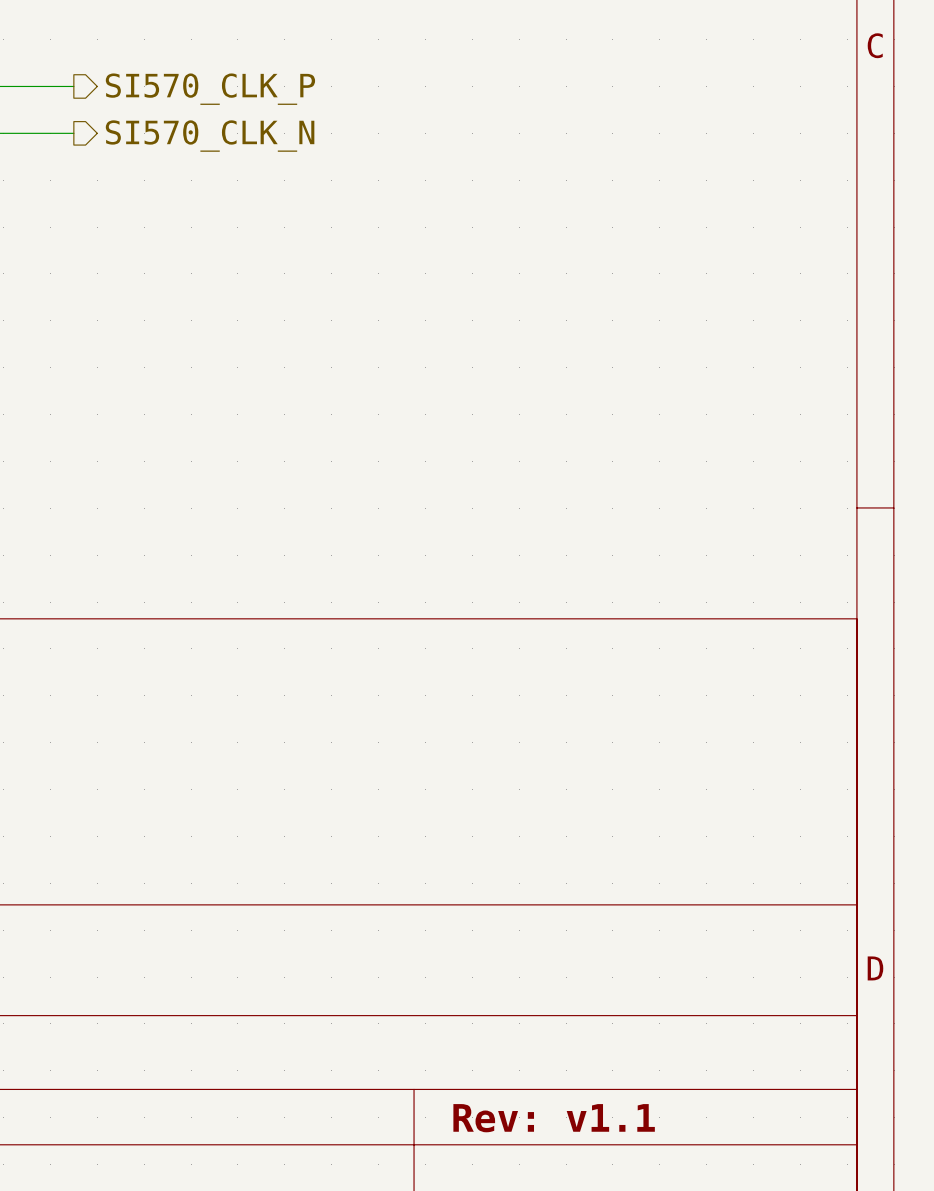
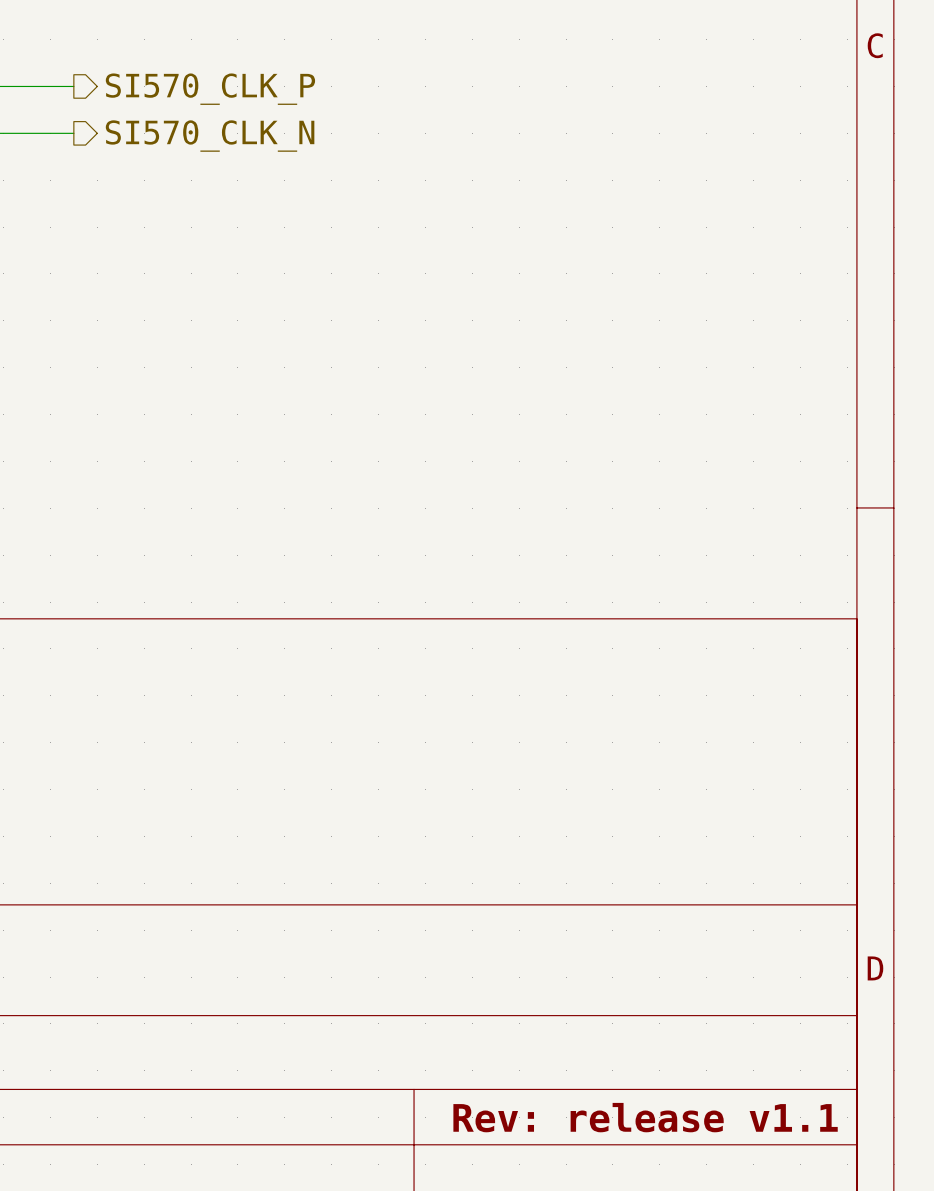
title block: Rev: v1.1 (554, 1118) -> Rev: release v1.1 (645, 1117)

